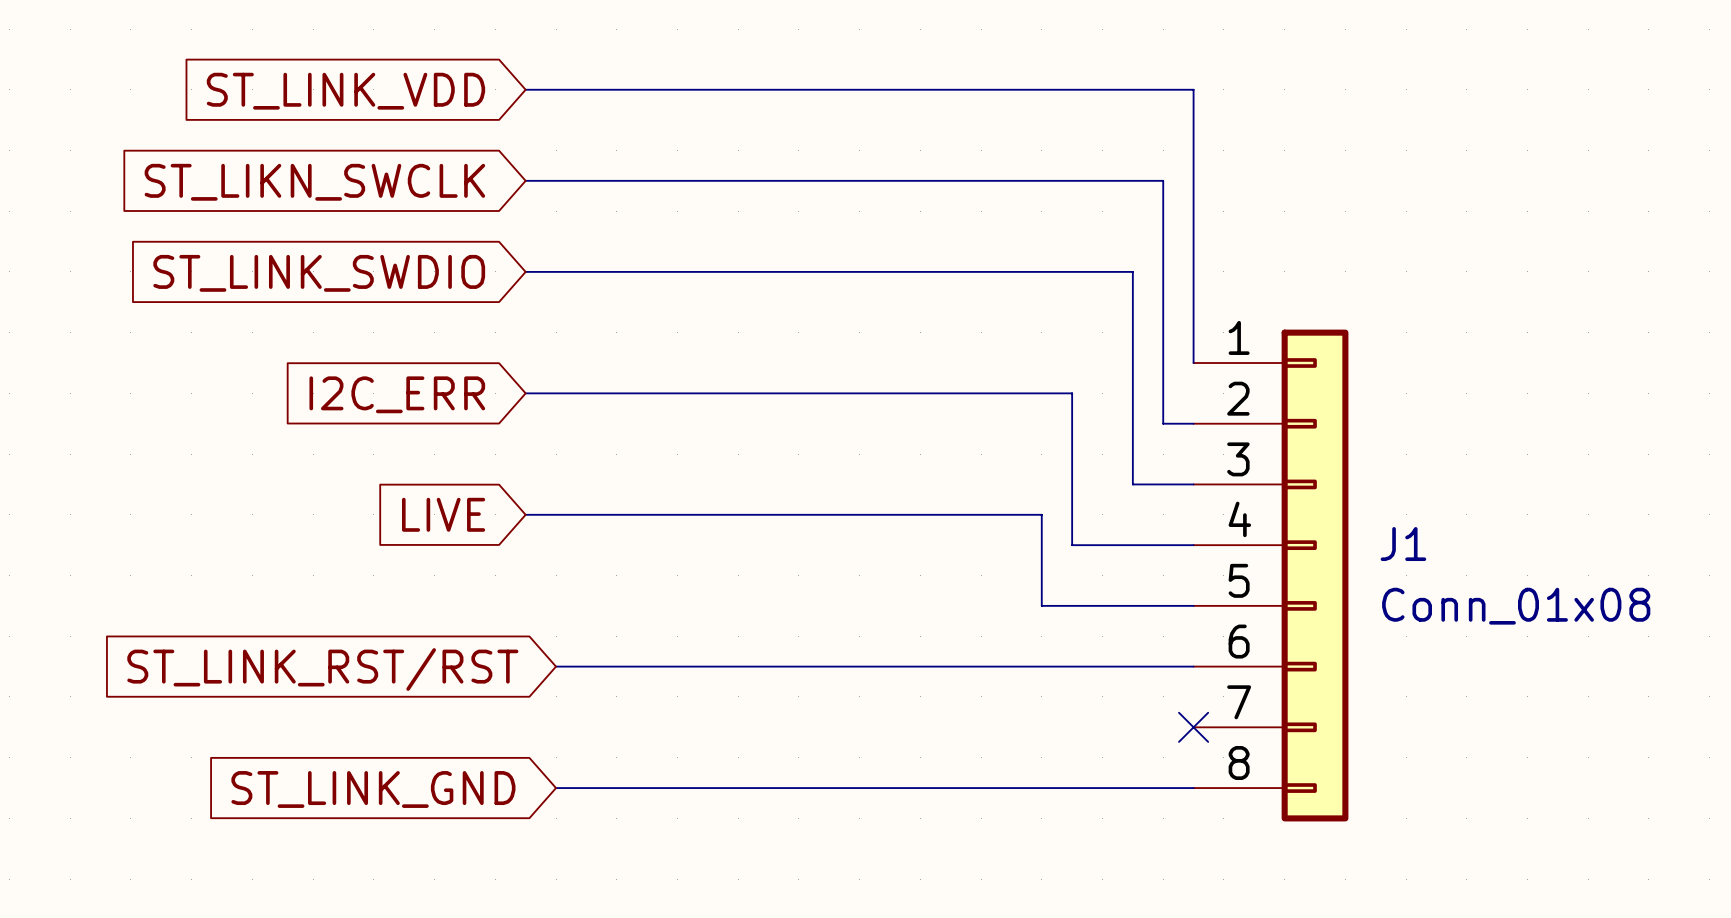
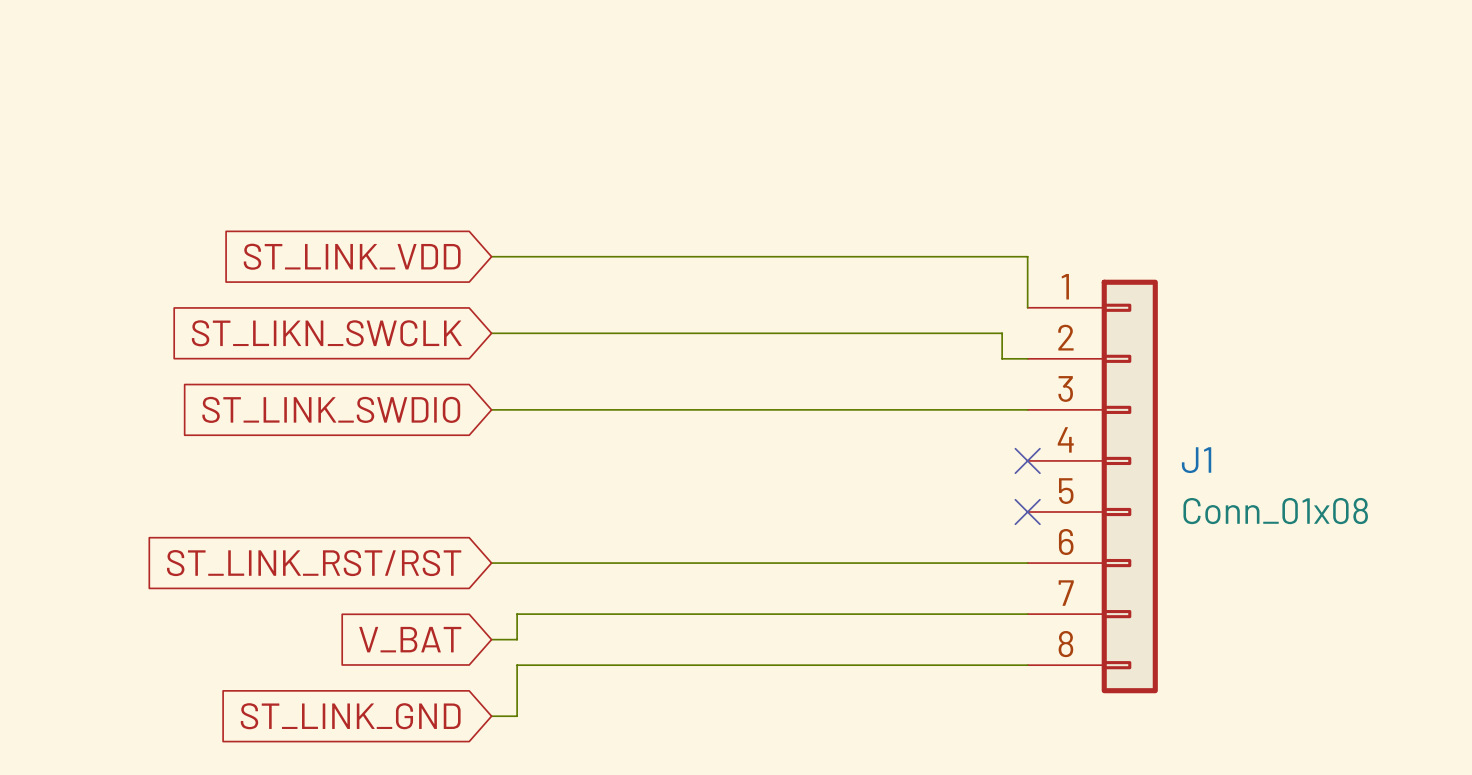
wire: (525, 89) (1193, 89) (1193, 302) -> (491, 256) (1027, 256)
global label position: ST_LINK_VDD (345, 91) -> ST_LINK_VDD (352, 256)
wire: (525, 180) (1163, 180) (1163, 393) -> none
global label position: ST_LIKN_SWCLK (314, 182) -> ST_LIKN_SWCLK (326, 333)
wire: (525, 271) (1132, 271) (1132, 484) -> (491, 409) (976, 409)
global label position: ST_LINK_SWDIO (319, 273) -> ST_LINK_SWDIO (331, 409)
wire: (525, 393) (556, 393) -> none
wire: (1072, 393) (1072, 545) (1193, 545) -> (925, 333) (1002, 333)
global label: I2C_ERR (397, 394) -> none
global label: LIVE (443, 514) -> none
wire: (525, 514) (1041, 514) (1041, 605) (1193, 605) -> none
no-connect mark: none -> (1027, 460)
no-connect mark: none -> (1027, 512)
wire: none -> (1027, 614) (517, 614) (517, 639) (491, 639)
no-connect mark: (1193, 727) -> none
global label: none -> V_BAT (410, 639)
wire: (556, 788) (586, 788) -> (491, 716) (517, 716) (517, 665)
global label position: ST_LINK_GND (373, 789) -> ST_LINK_GND (350, 716)

